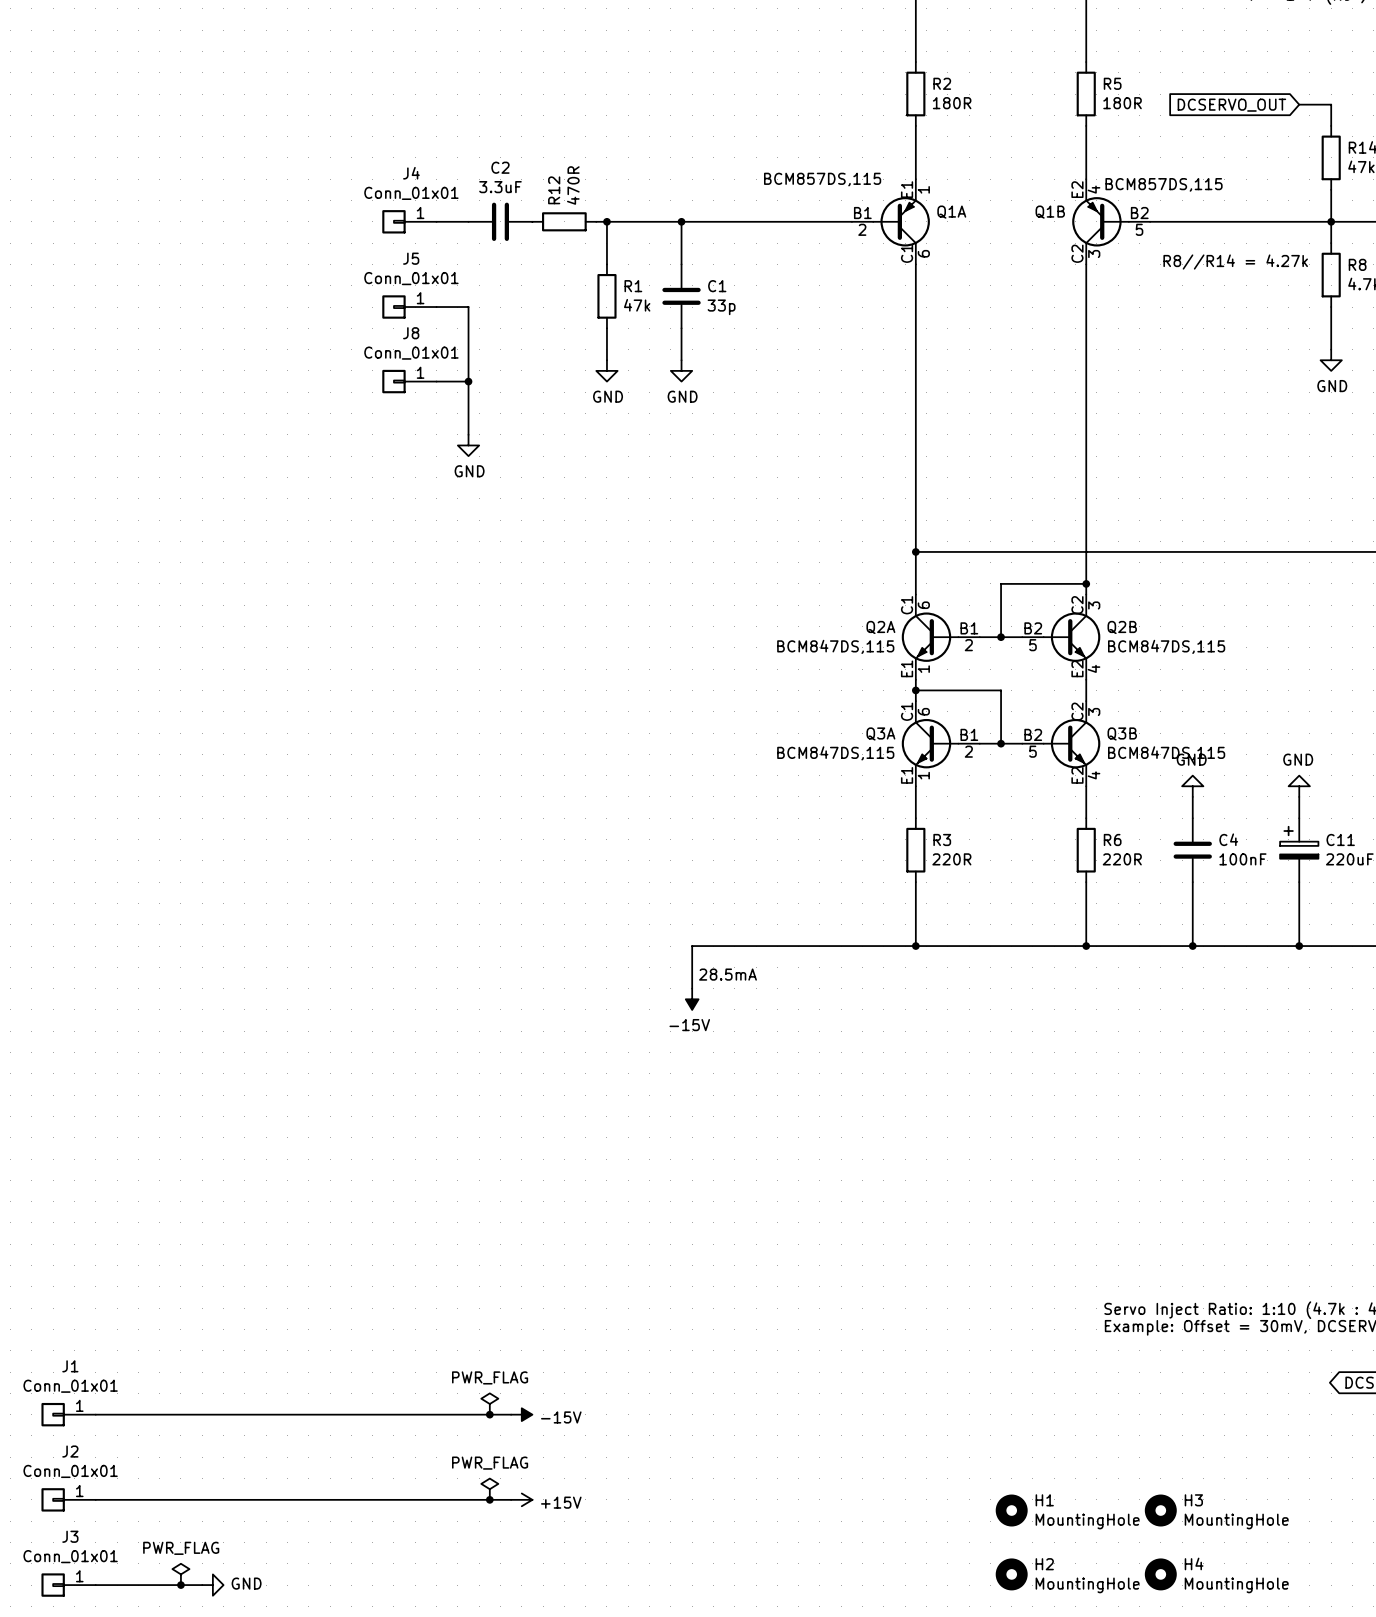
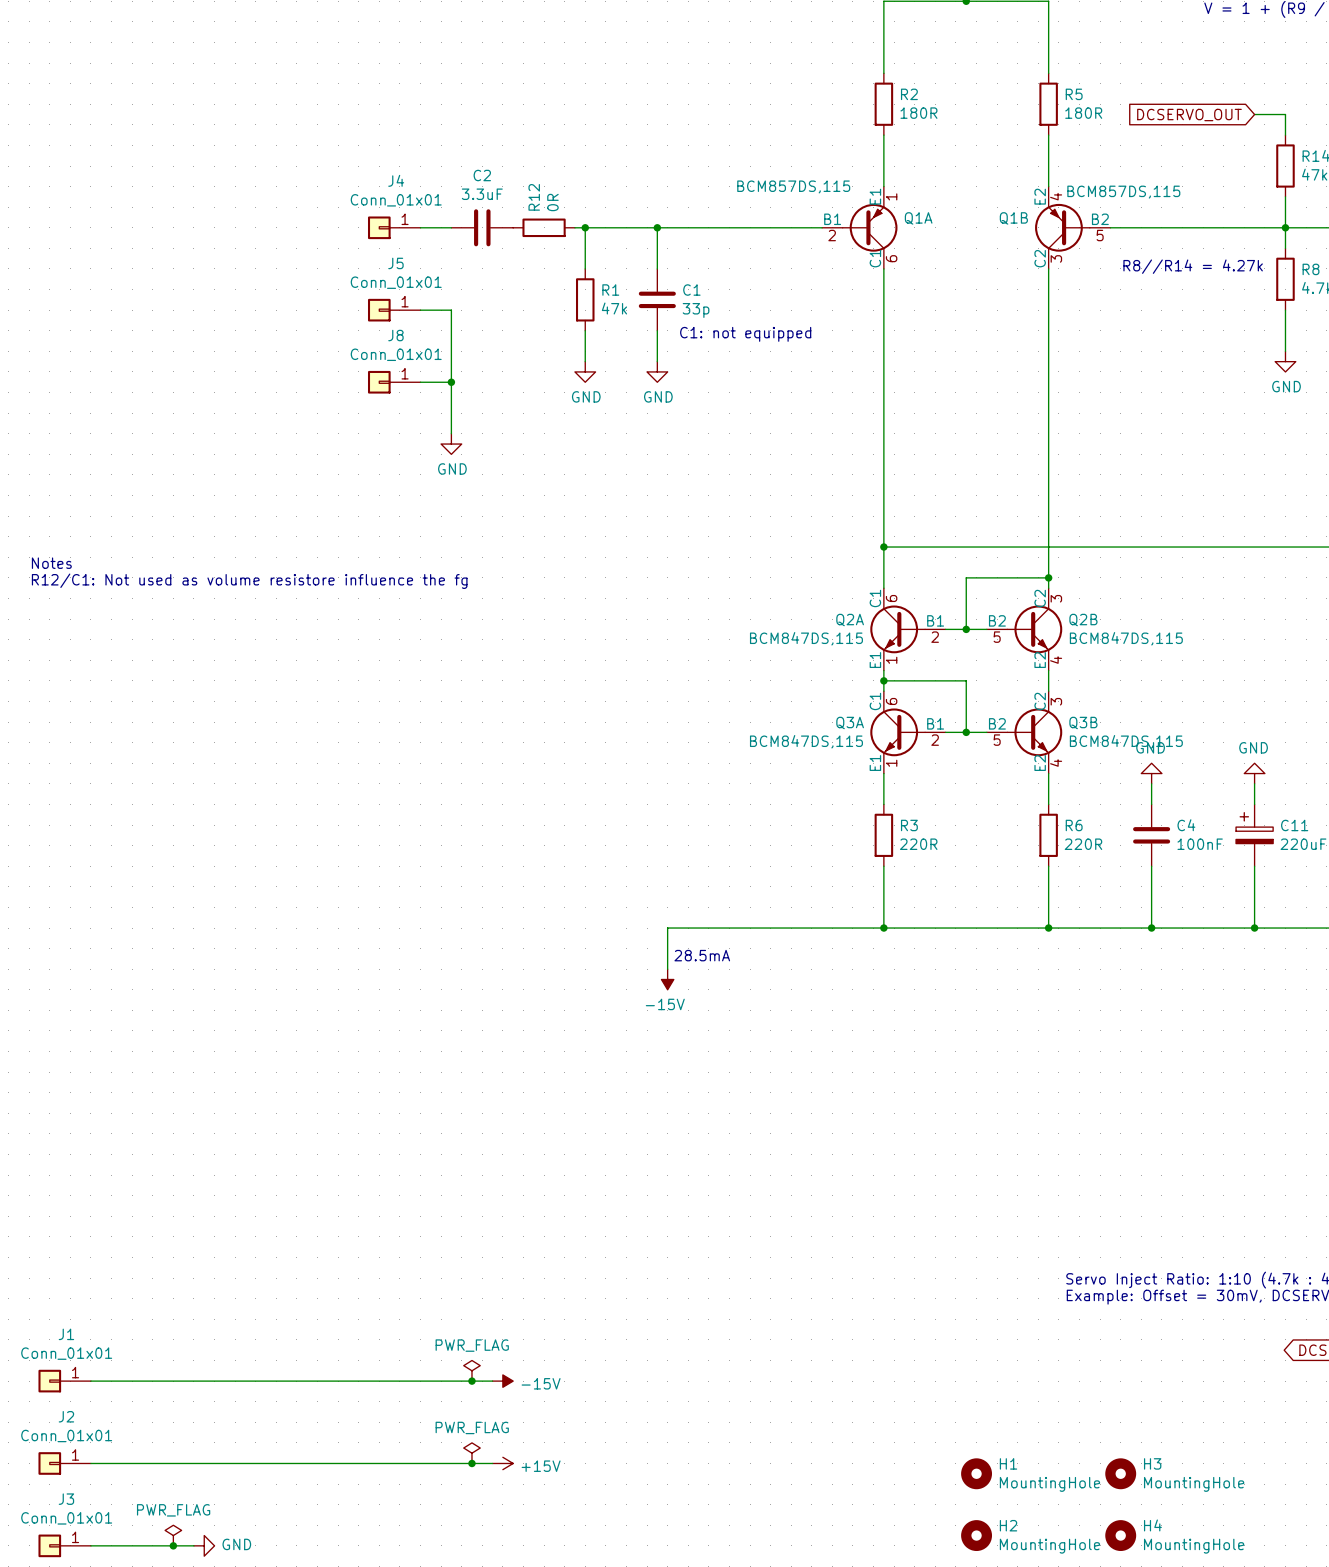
R12 value: 470R (573, 185) -> 0R (552, 202)
text: none -> C1: not equipped (745, 334)
text: none -> Notes (51, 563)
text: none -> R12/C1: Not used as volume resistore influence the fg (249, 581)

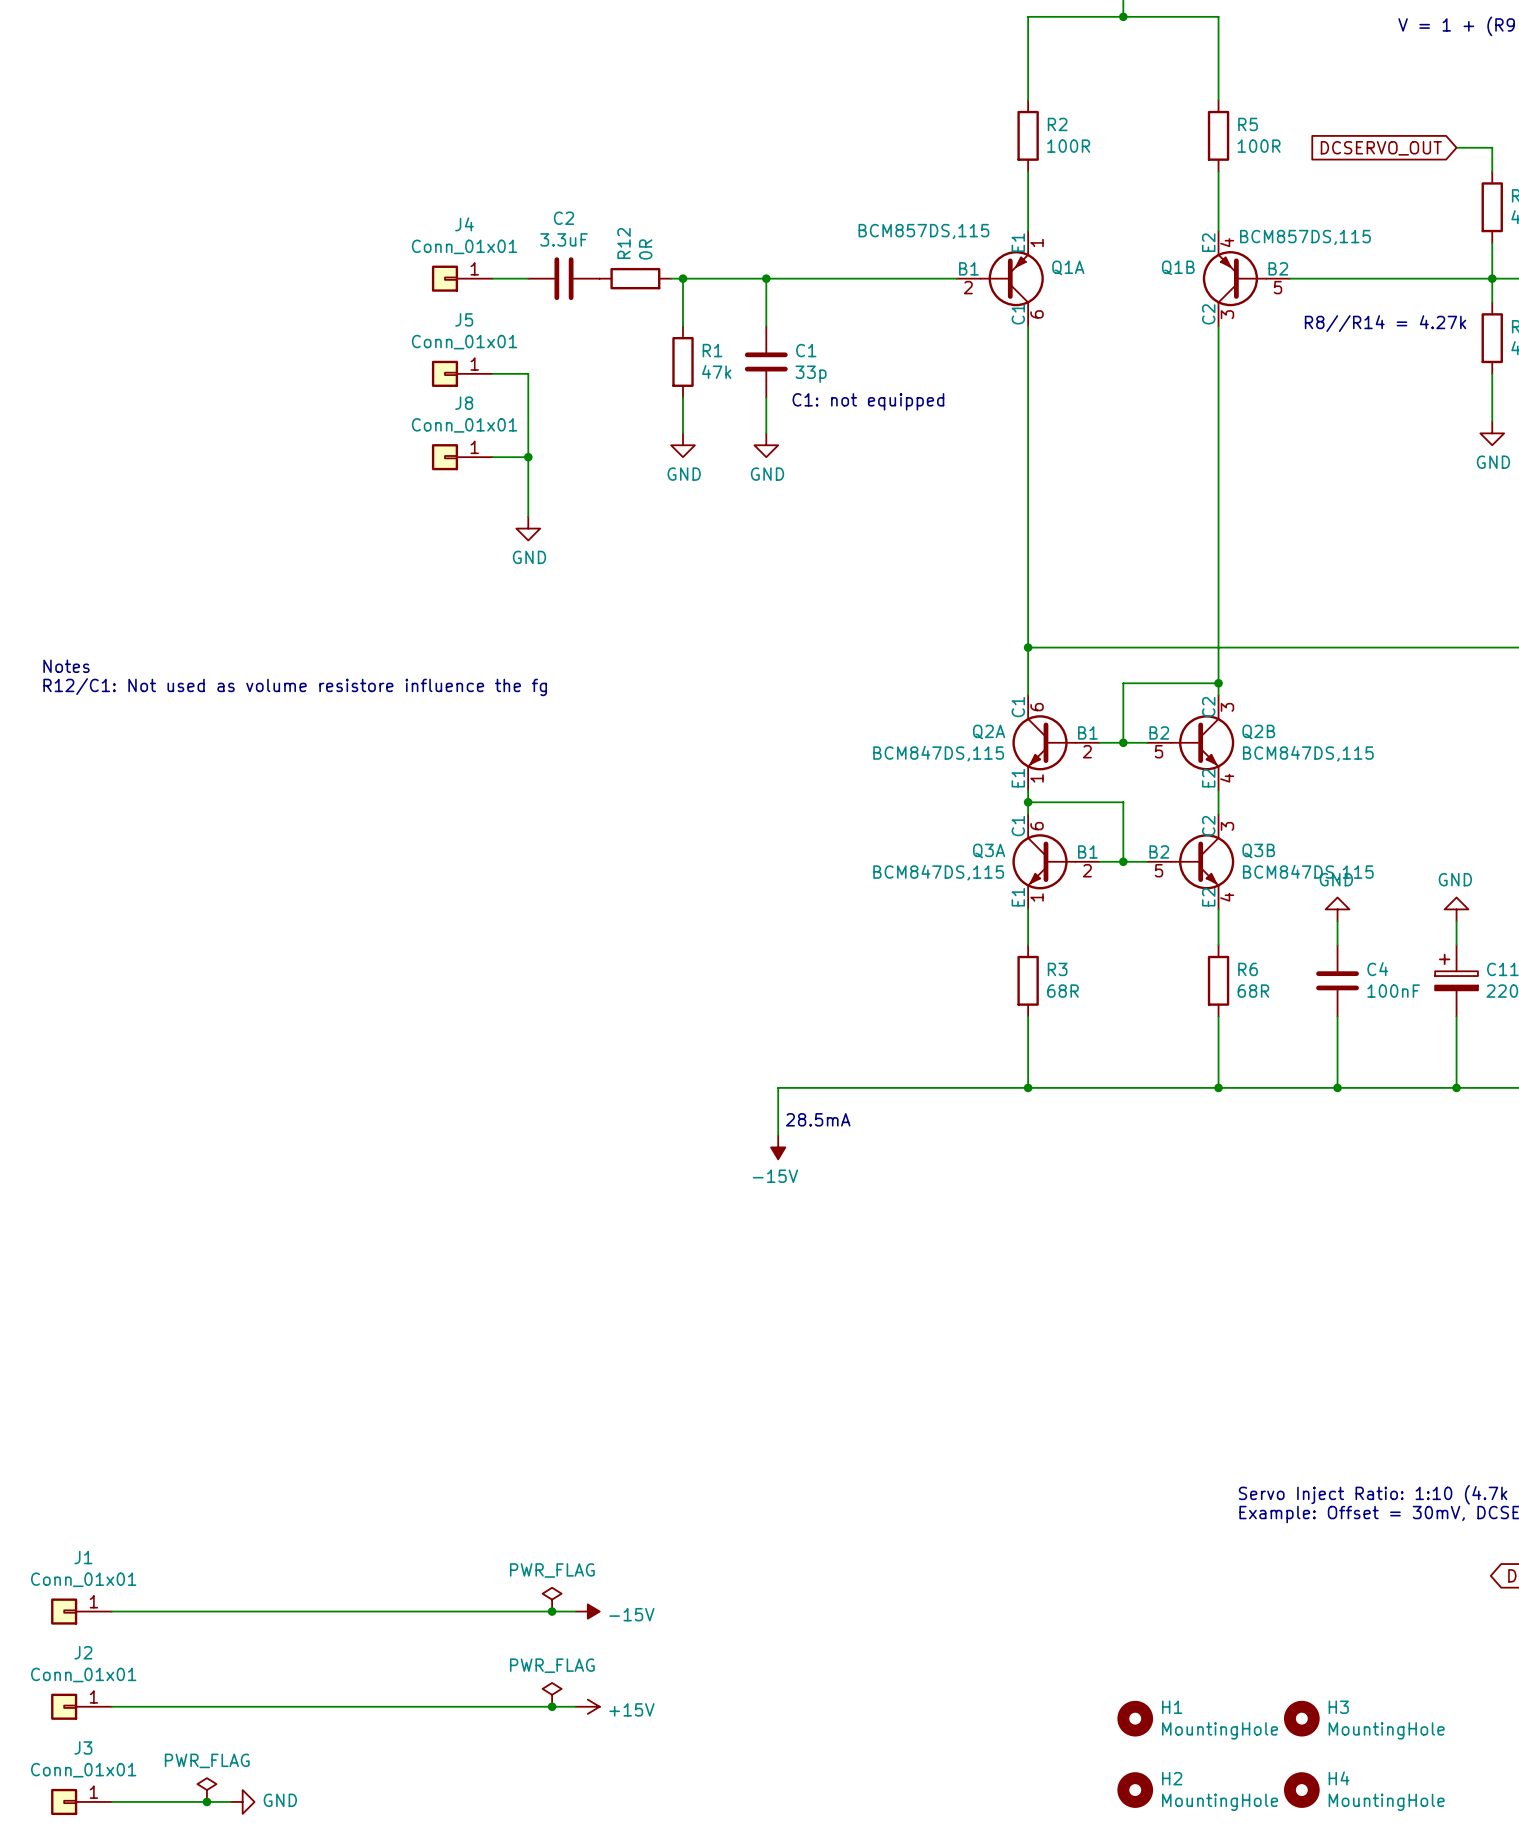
R2 value: 180R (918, 113) -> 100R (1068, 146)
R5 value: 180R (1083, 113) -> 100R (1259, 146)
R3 value: 220R (918, 844) -> 68R (1063, 991)
R6 value: 220R (1083, 844) -> 68R (1253, 991)

